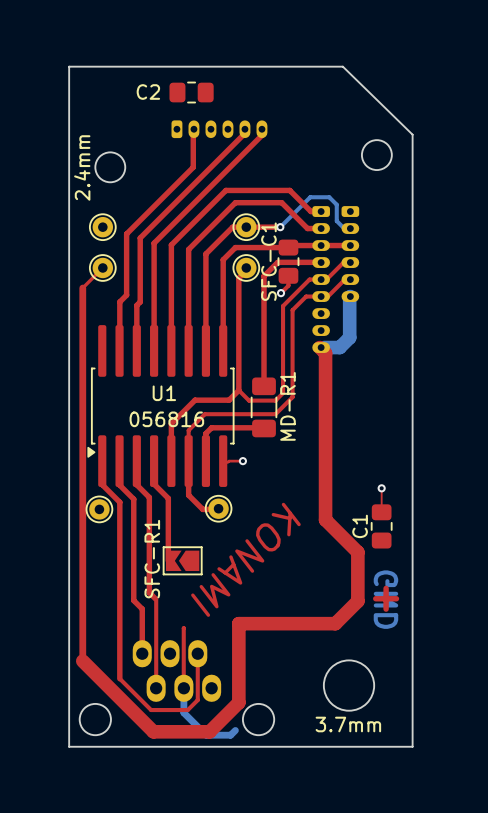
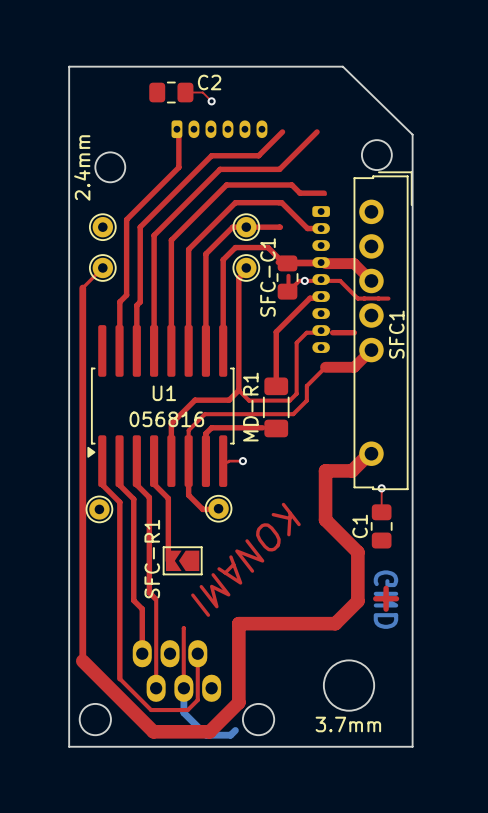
C2 name position: C2 (148, 92) -> C2 (209, 82)
top track: none -> (185, 92) (202, 92) (211, 101)
C2 position: (191, 92) -> (171, 92)
via: none -> (211, 101)
top track: (244, 125) (244, 133) (140, 238) -> (282, 131) (258, 155) (211, 155) (140, 227) (140, 238)
top track: (261, 127) (261, 135) (154, 243) -> (317, 131) (279, 169) (220, 169) (154, 235) (154, 243)
top track: (193, 129) (193, 167) (126, 233) -> (178, 131) (178, 167) (126, 219) (126, 233)
top track: (324, 211) (310, 211) (289, 190) (225, 190) (171, 244) -> (325, 194) (300, 193) (291, 185) (226, 185) (171, 240) (171, 244)
bottom track: (280, 227) (310, 197) (329, 197) (336, 204) (336, 221) (344, 229) (349, 229) -> none
via: (280, 227) -> none
top track: (347, 245) (268, 247) -> (280, 259) (268, 247)
part: (350, 254) -> none
SFC-C1 position: (288, 261) -> (287, 277)
top track: (278, 262) (264, 276) (264, 386) -> none
top track: none -> (288, 263) (354, 263) (371, 280)
top track: (349, 263) (342, 263) (326, 279) (309, 279) (283, 306) (283, 393) (275, 400) -> (329, 329) (325, 332) (306, 332) (296, 342) (296, 393) (289, 400) (275, 400)
top track: (349, 280) (344, 280) (327, 296) (306, 296) (292, 310) (292, 397) (275, 414) -> (366, 350) (371, 350) (354, 367) (325, 367) (306, 385) (306, 400) (293, 414) (275, 414)
top track: none -> (288, 292) (299, 280) (340, 280) (357, 298) (364, 298)
via position: (281, 293) -> (304, 280)
bottom track: (350, 296) (349, 337) (339, 347) (324, 347) -> none
top track: none -> (325, 298) (309, 298) (276, 331) (276, 386)
top track: none -> (364, 298) (378, 298)
top track: none -> (378, 298) (388, 298)
SFC1: none -> (383, 330)
top track: none -> (332, 332) (354, 332)
top track: (319, 347) (325, 353) (325, 470) -> (371, 451) (352, 470) (325, 470)
MD-R1 name position: MD-R1 (287, 406) -> MD-R1 (250, 407)
MD-R1 position: (264, 407) -> (276, 407)

